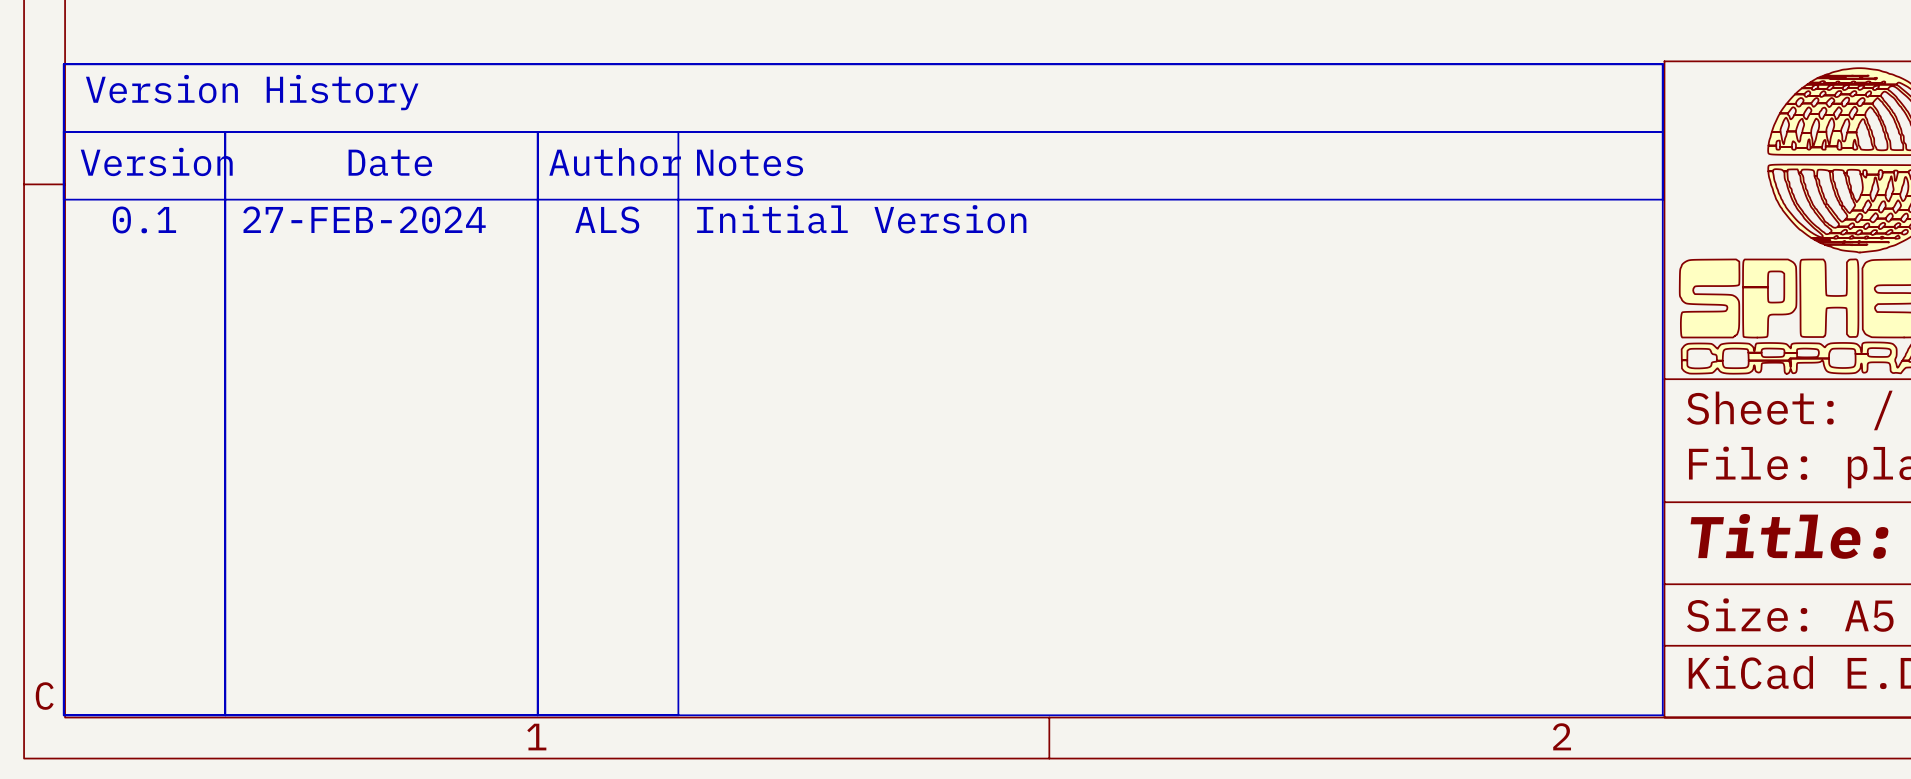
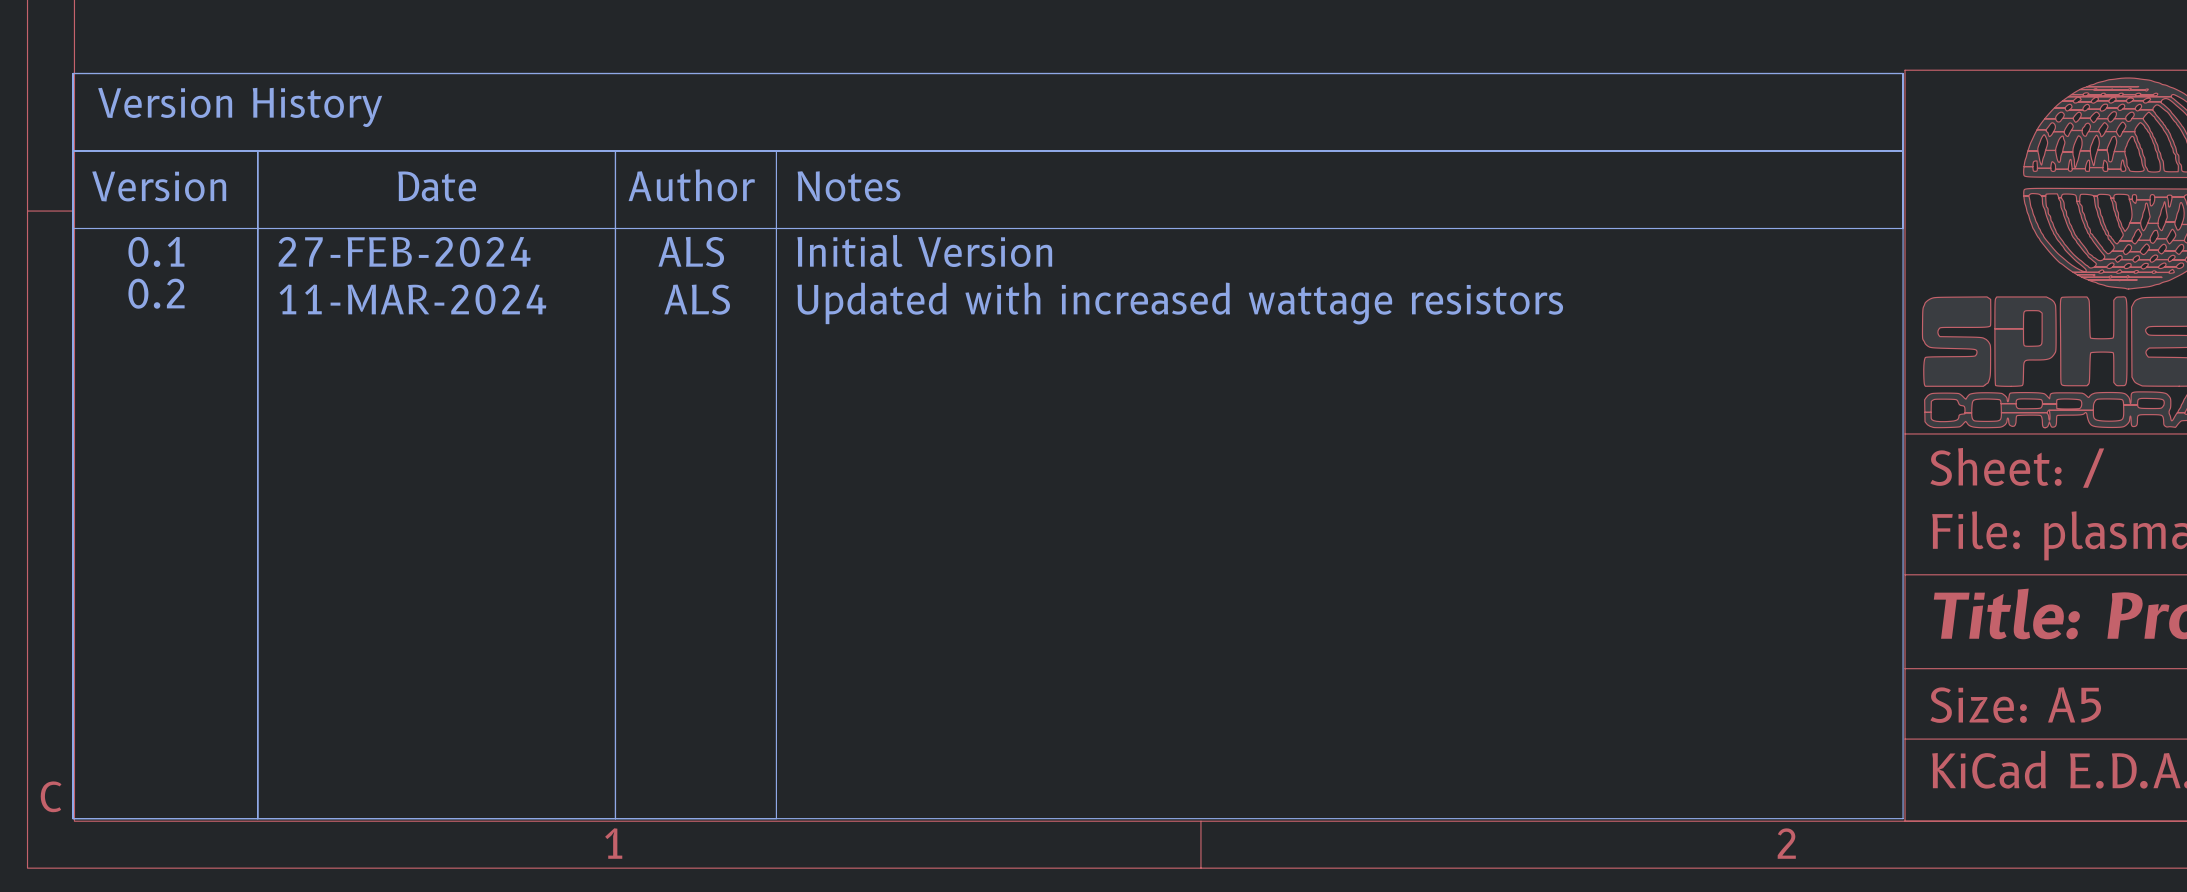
text: none -> 0.2 (156, 293)
text: none -> 11-MAR-2024 (412, 299)
text: none -> ALS (697, 299)
text: none -> Updated with increased wattage resistors (1180, 303)

